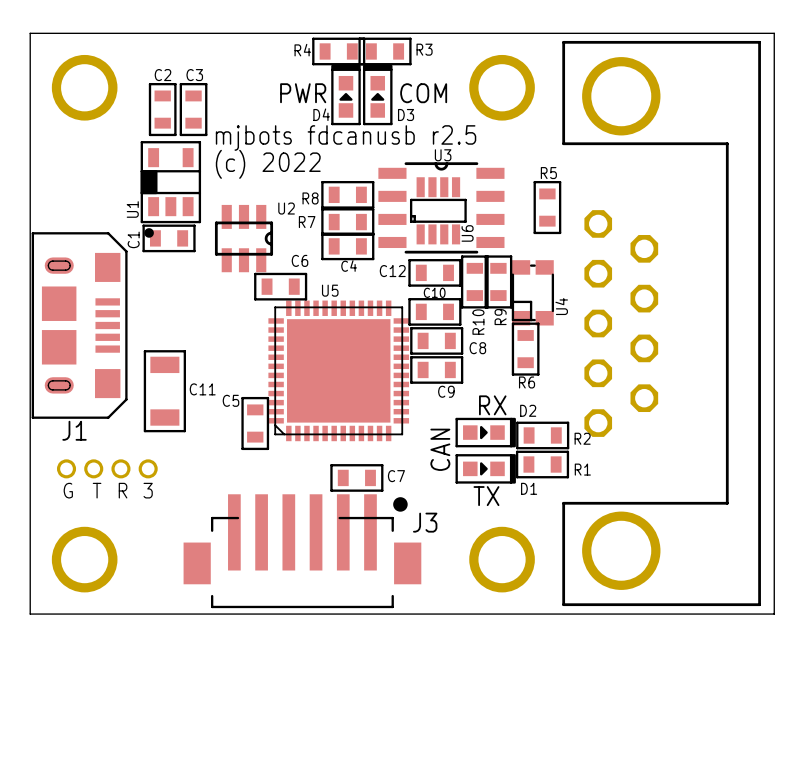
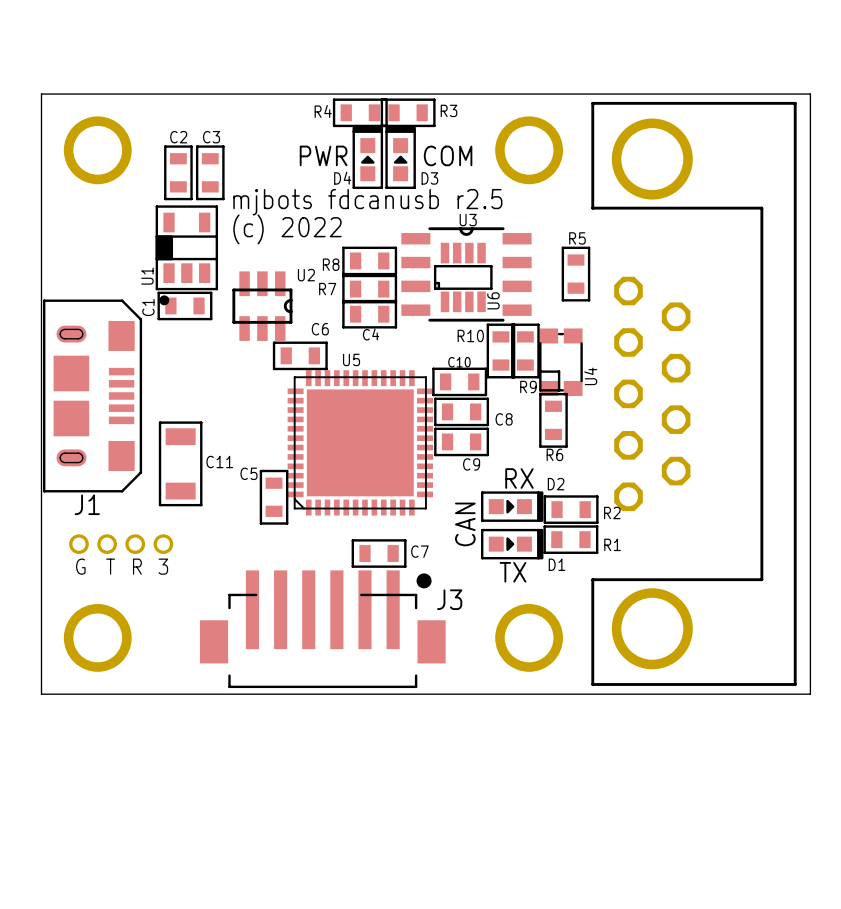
C12: (434, 272) -> none
R9 name rotation: 0° (500, 317) -> 90° clockwise (528, 386)
R10 name rotation: 0° (478, 322) -> 90° clockwise (470, 335)
R10 name position: R10 (478, 322) -> R10 (470, 335)

